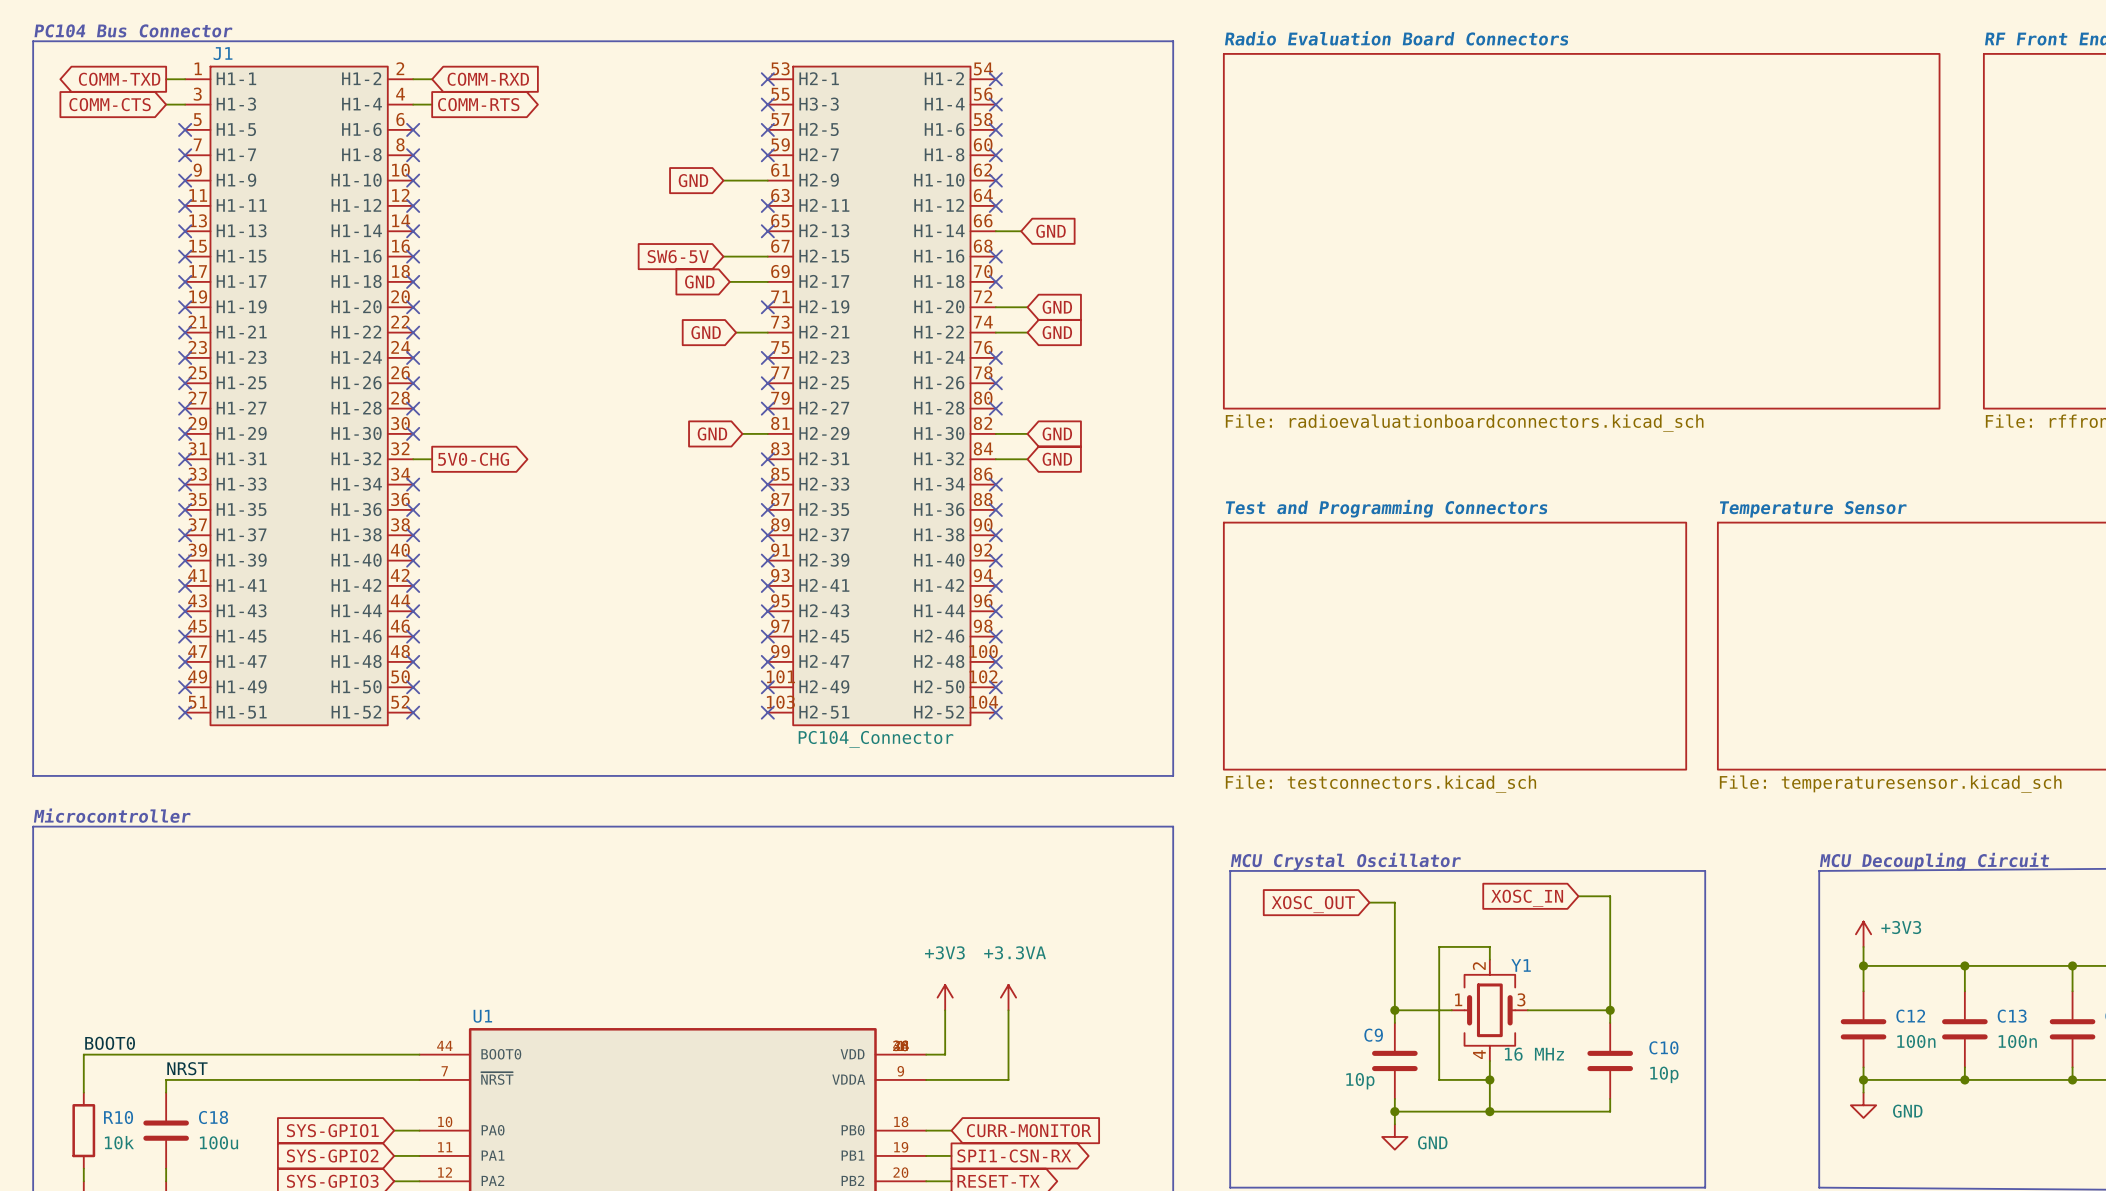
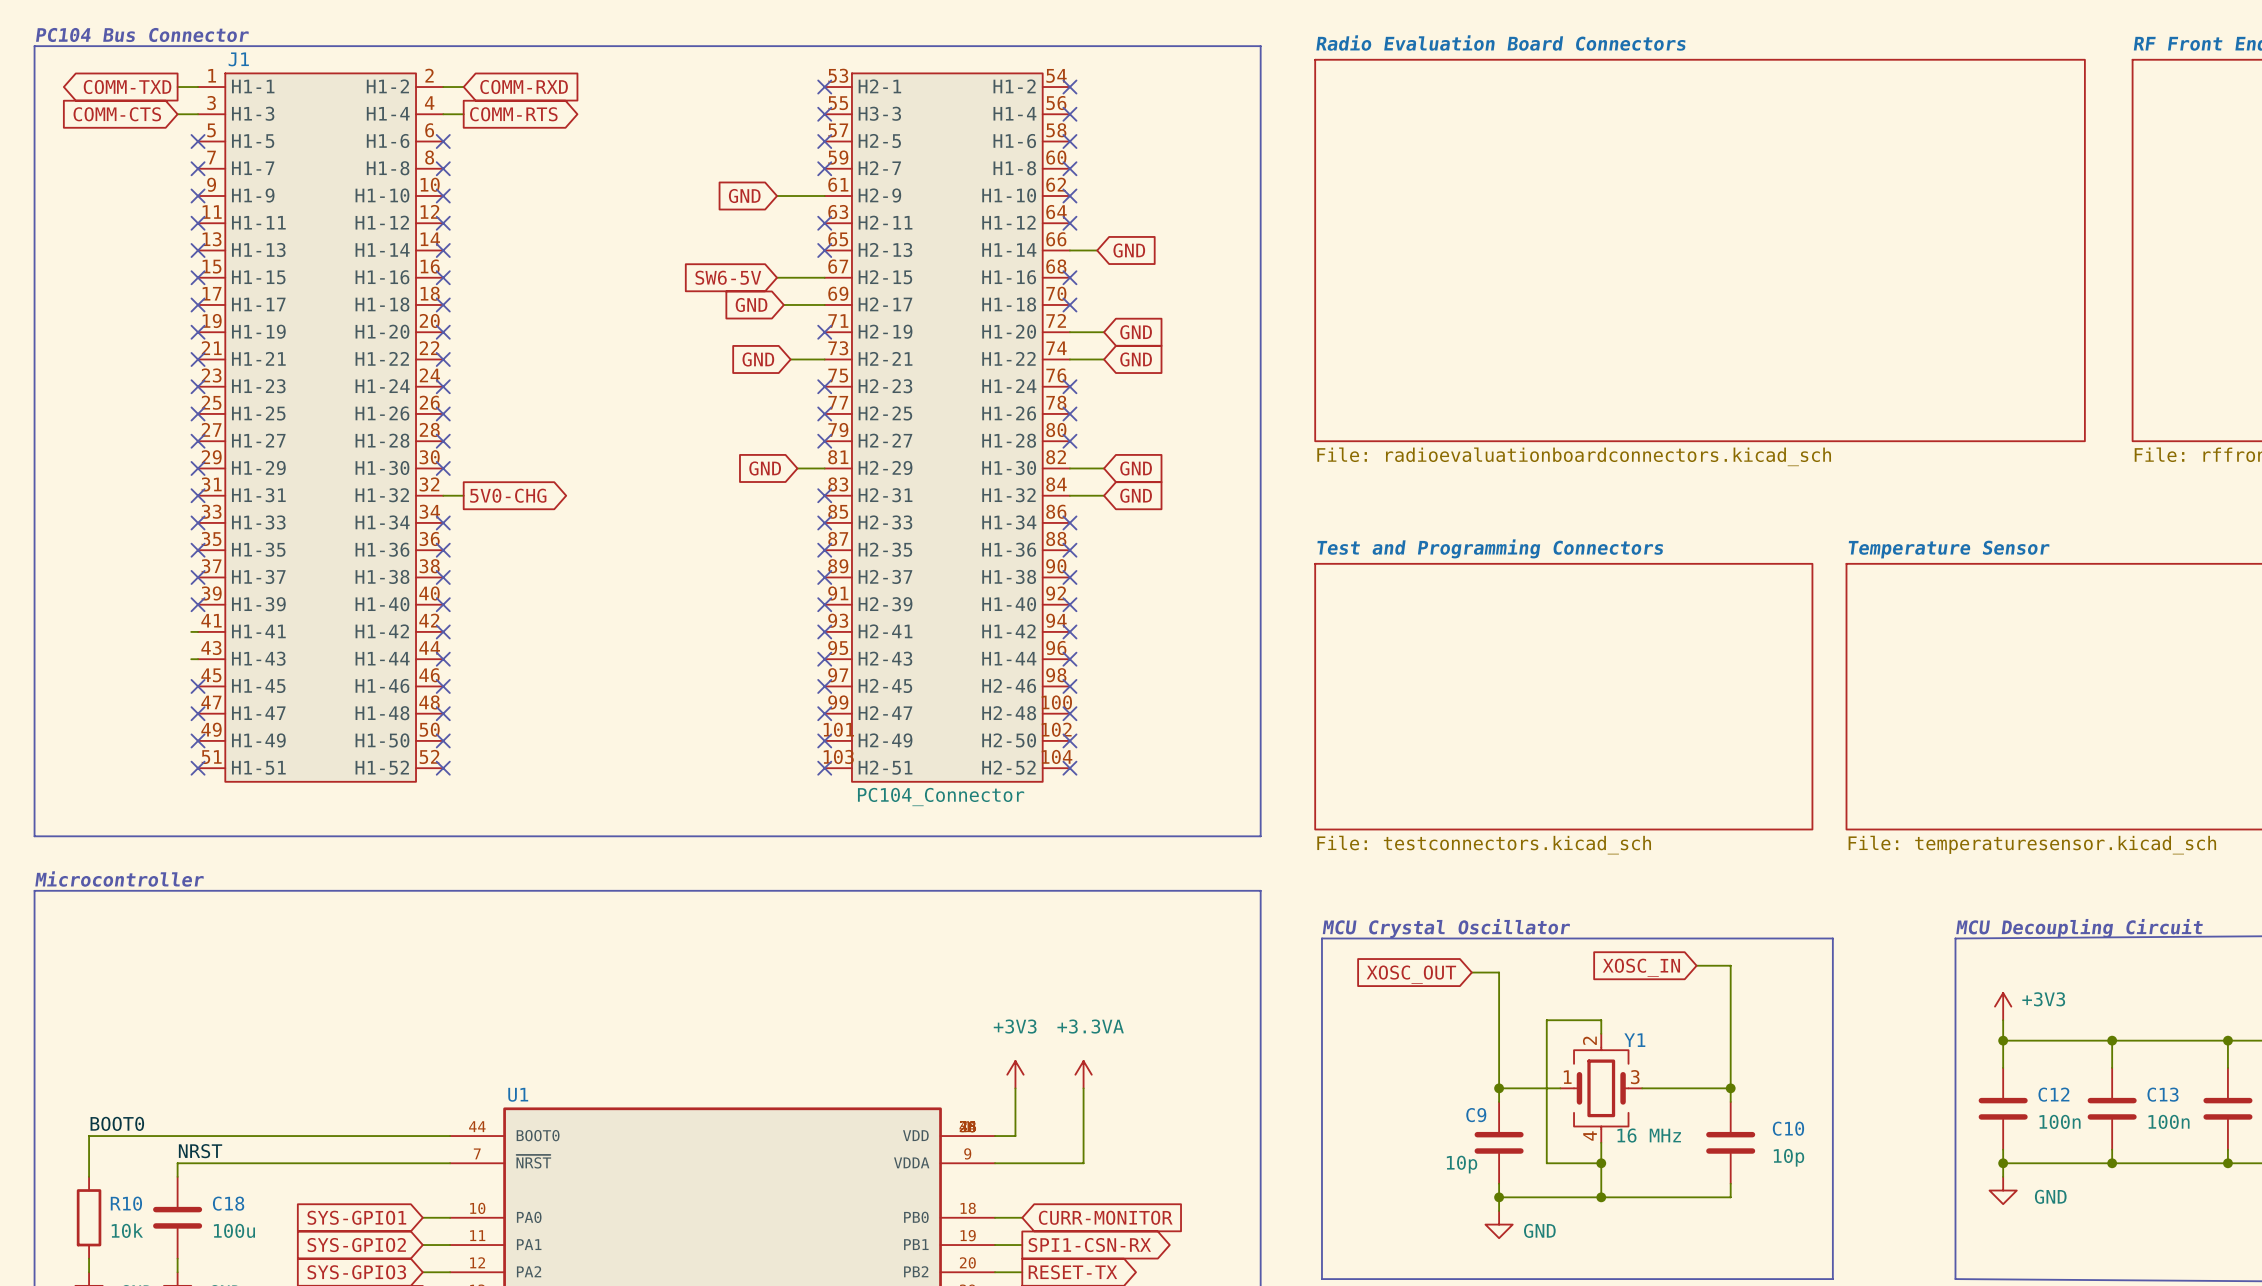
wire: none -> (191, 631) (198, 631)
no-connect mark: (185, 585) -> none
wire: none -> (191, 659) (198, 659)
no-connect mark: (185, 611) -> none

